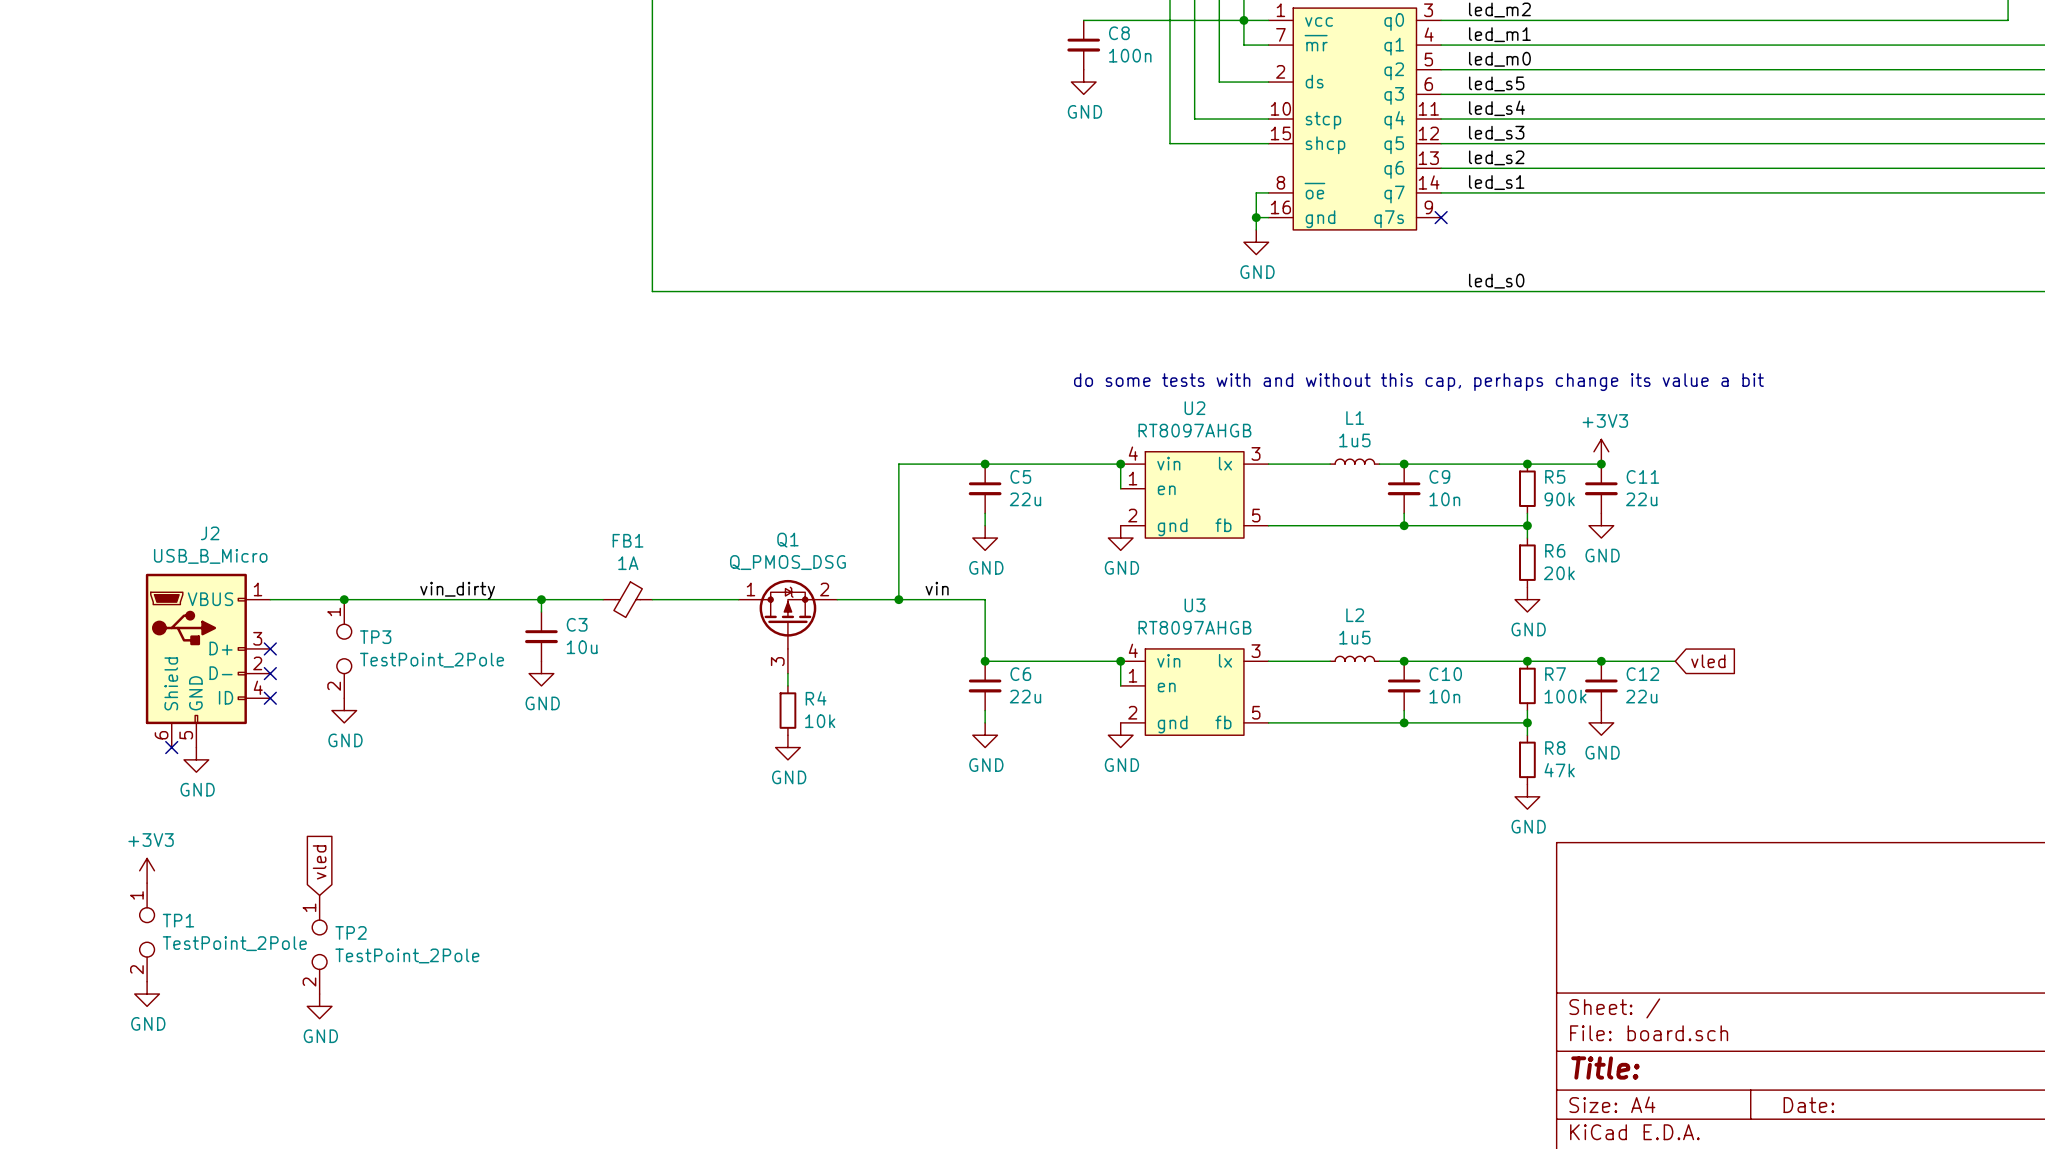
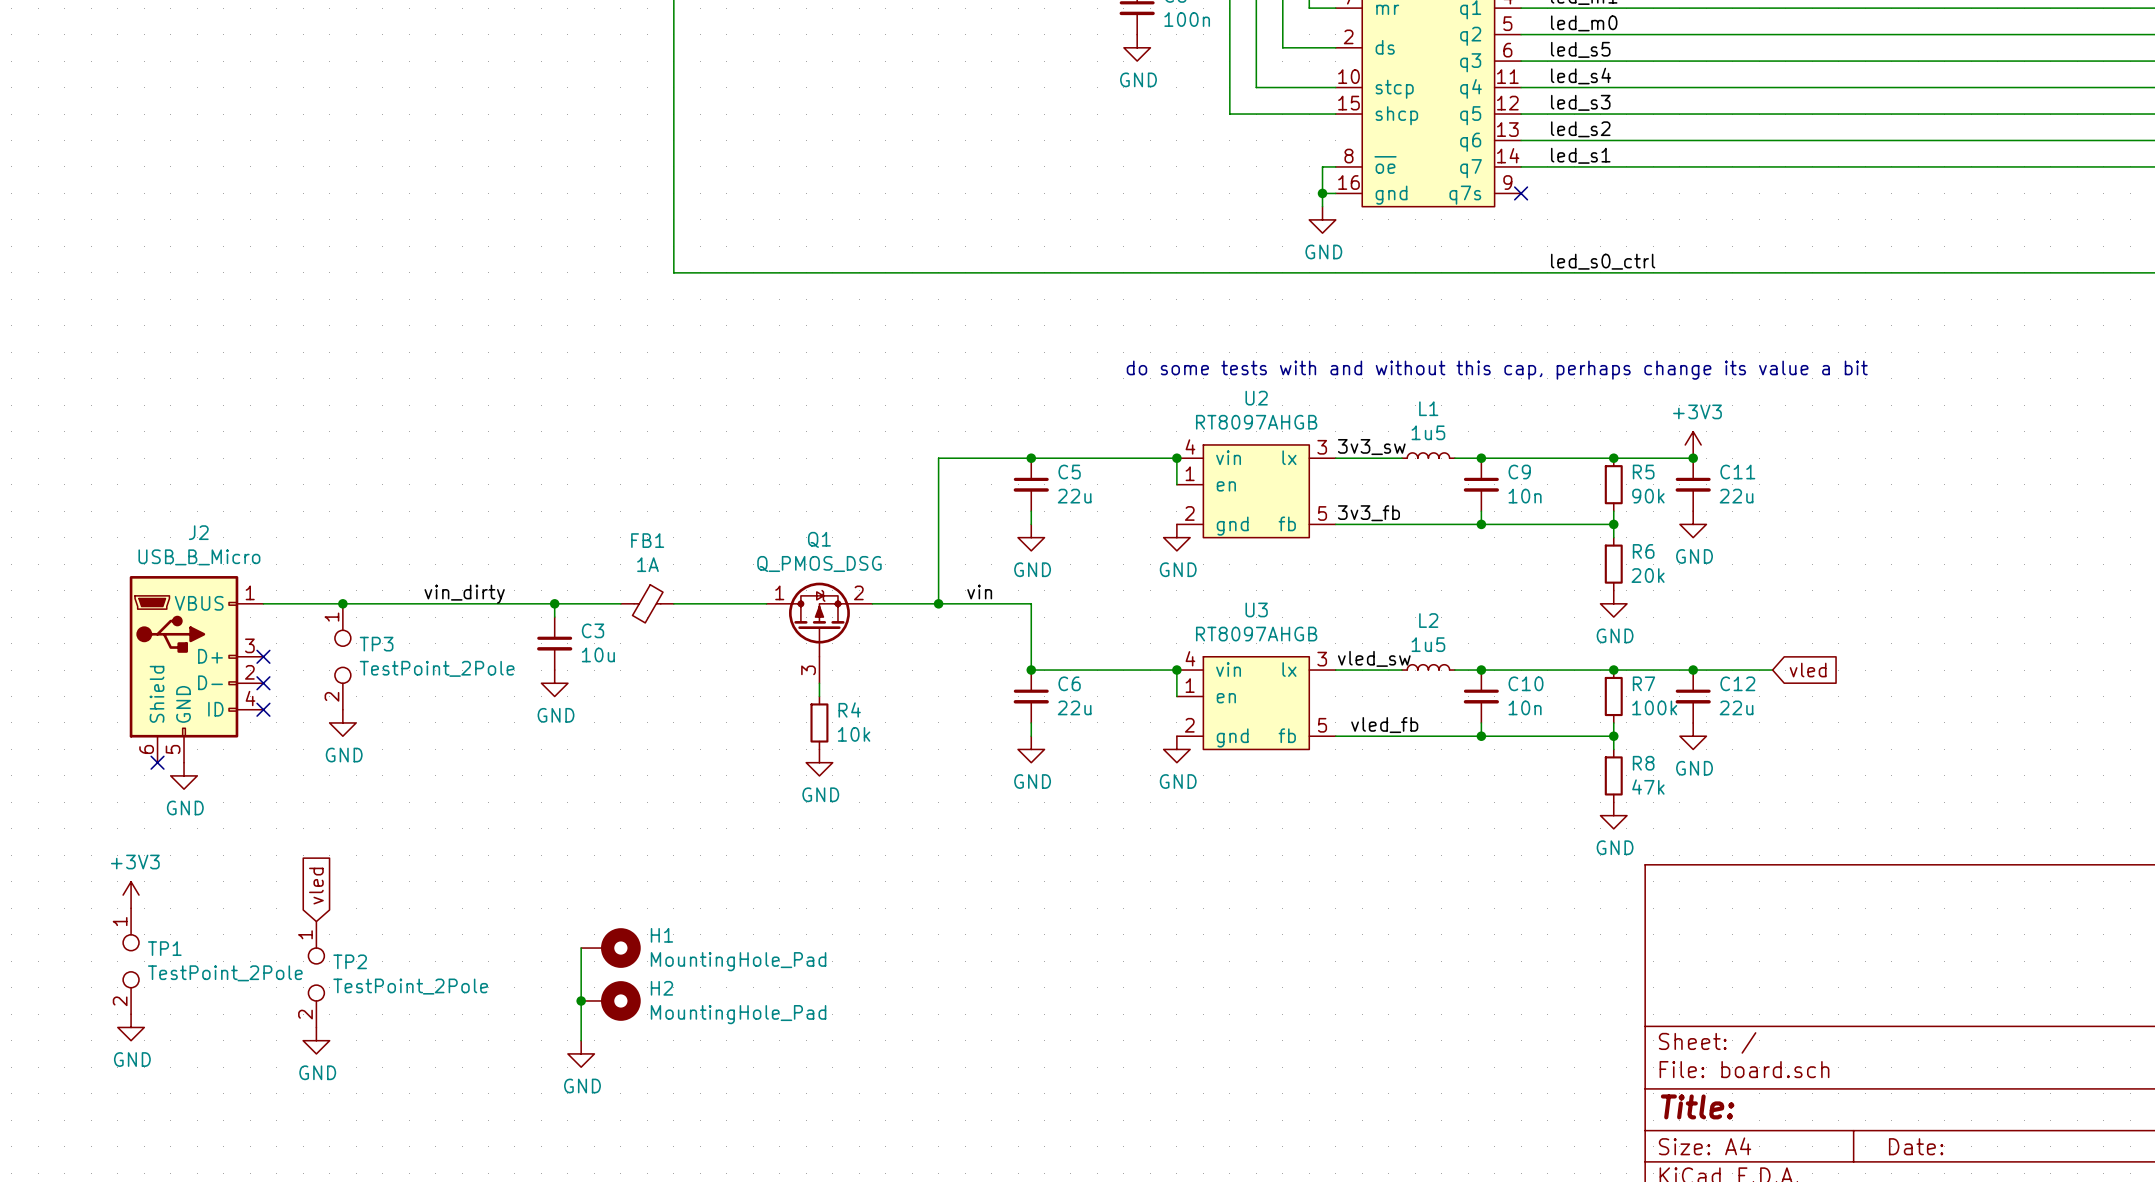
label: led_s0 (1496, 281) -> led_s0_ctrl (1603, 261)
label: none -> 3v3_sw (1371, 447)
label: none -> 3v3_fb (1368, 513)
label: none -> vled_sw (1374, 658)
label: none -> vled_fb (1384, 725)
wire: none -> (581, 948) (581, 1040)
H1: none -> MountingHole_Pad (610, 948)
junction: none -> (581, 1000)
H2: none -> MountingHole_Pad (610, 1000)
power symbol: none -> GND (581, 1053)

